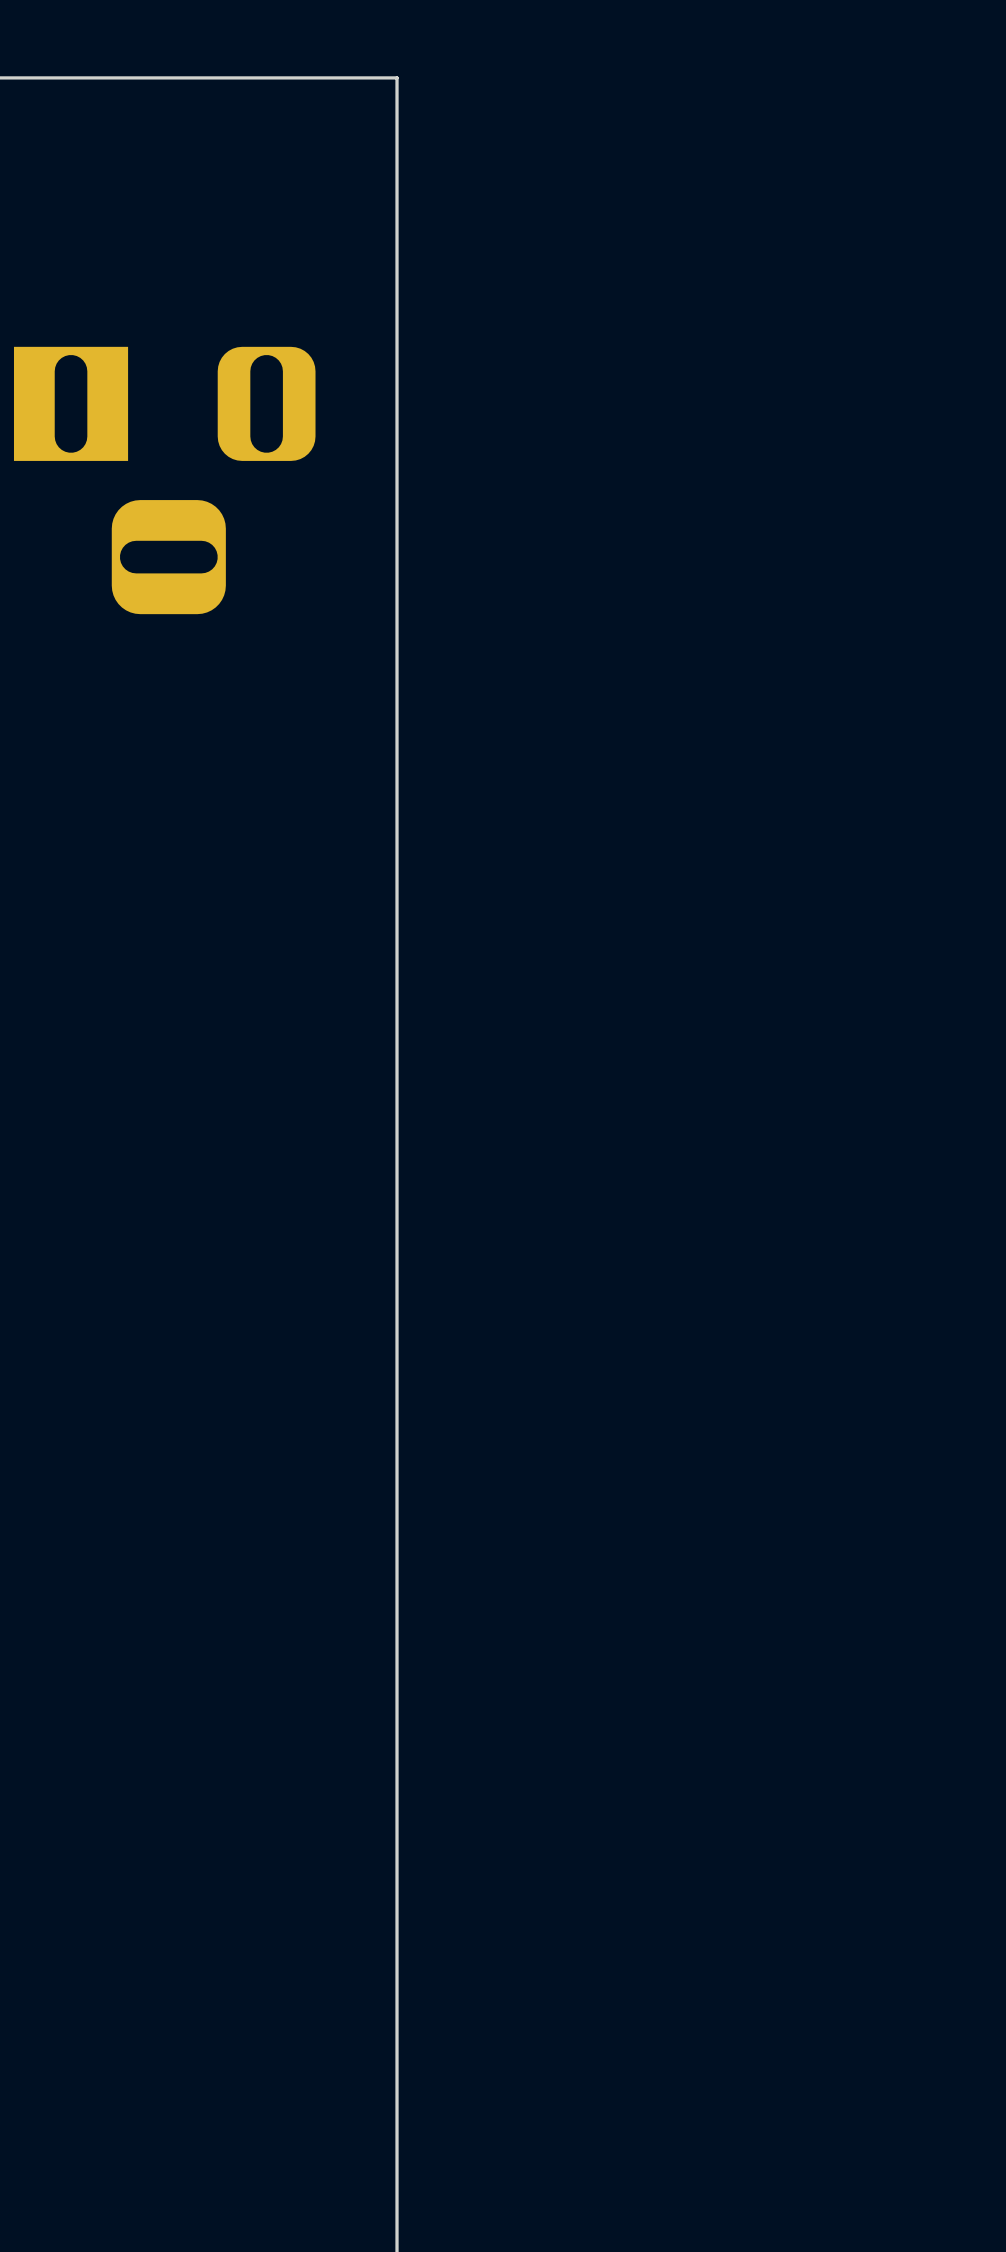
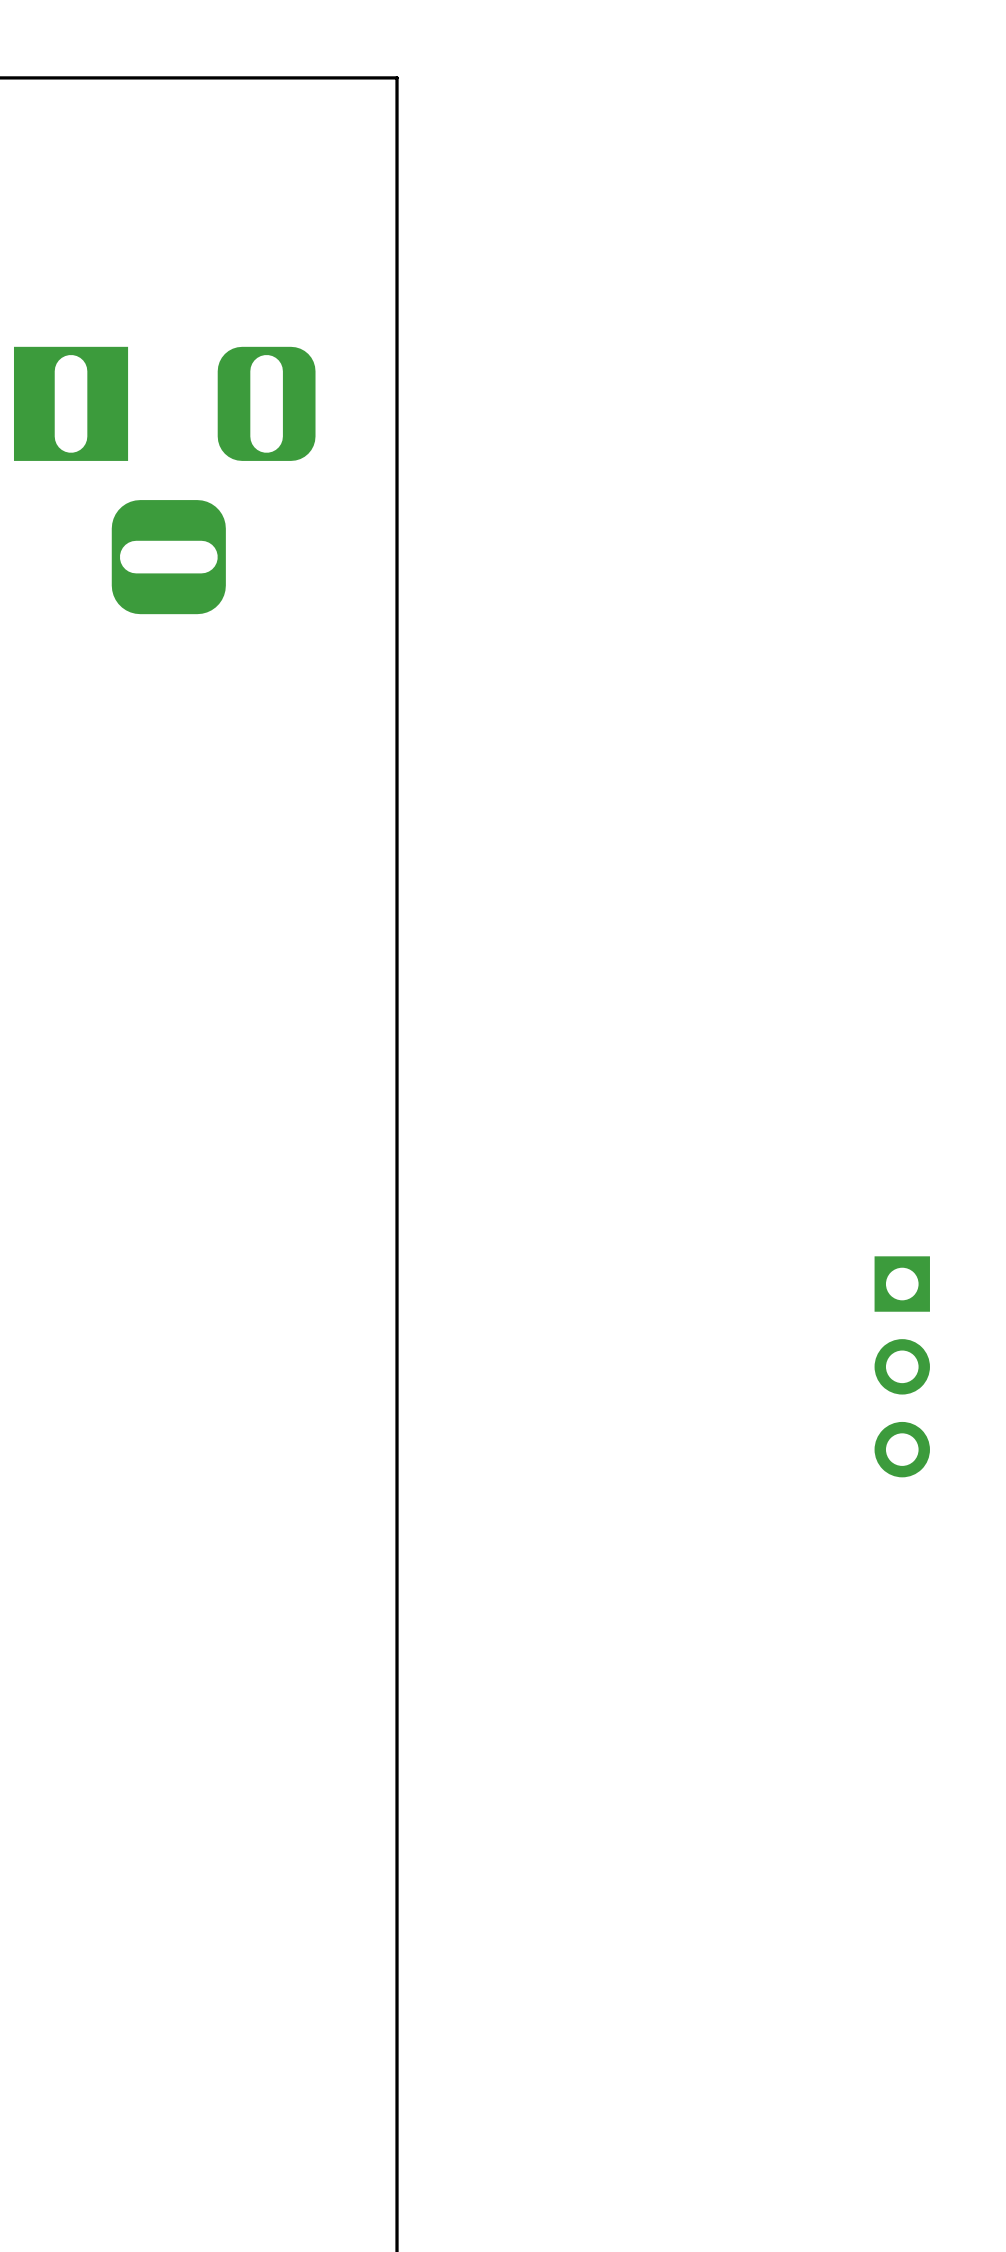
part: none -> (902, 1366)

